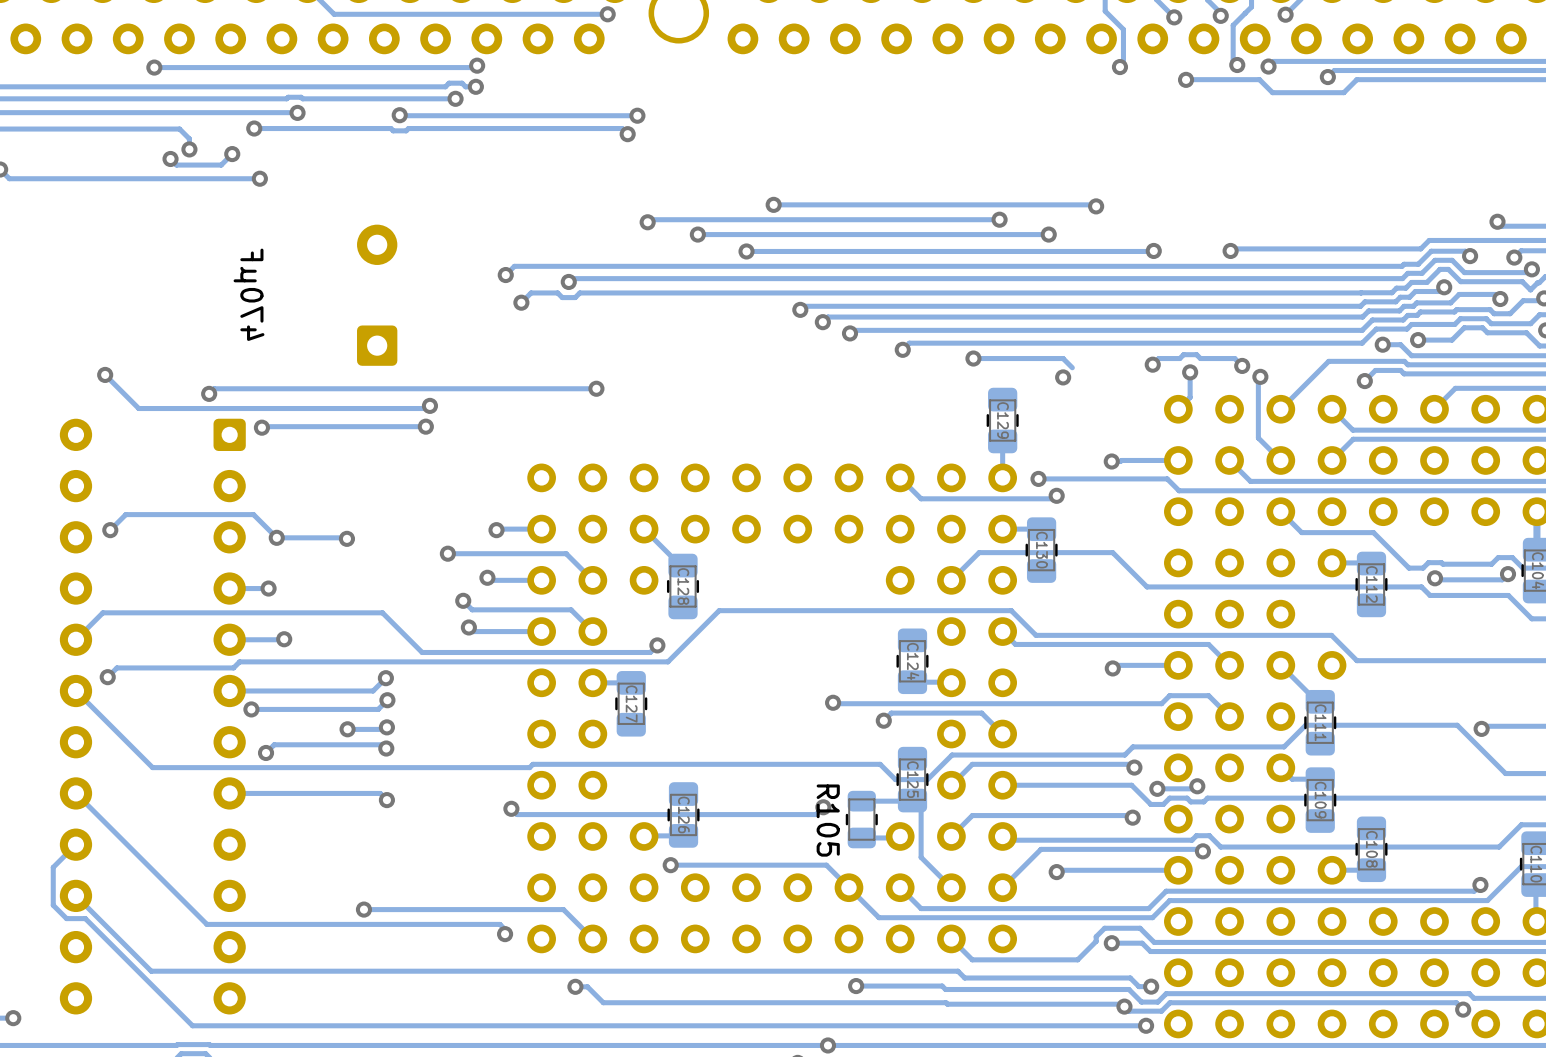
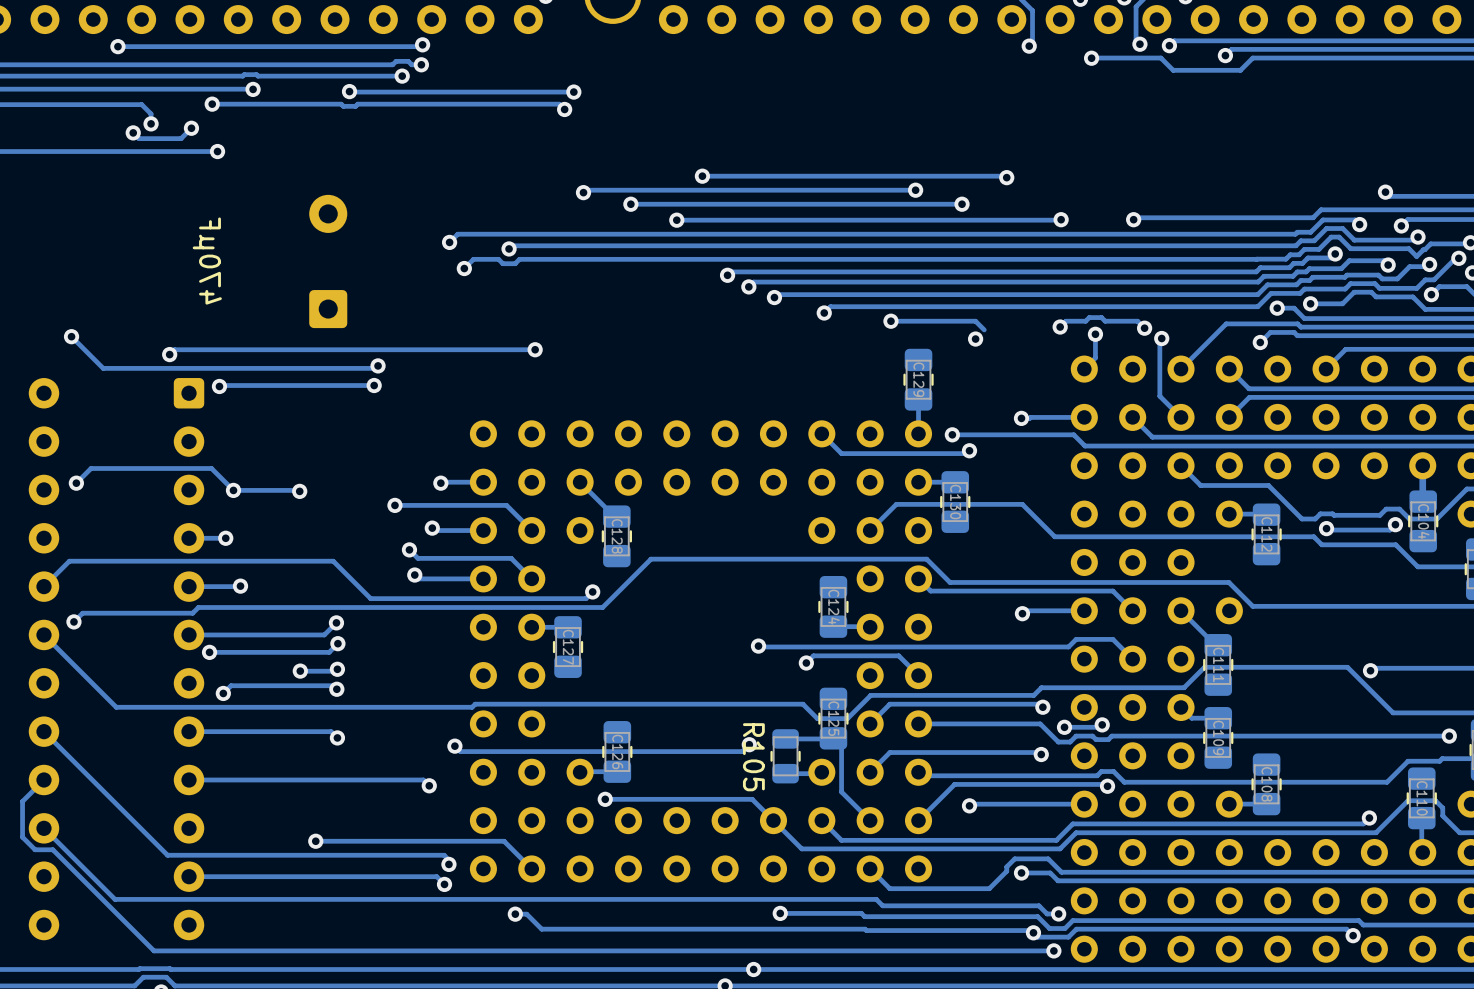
track: none -> (189, 780) (423, 780) (429, 785)
via: none -> (429, 785)
track: none -> (189, 876) (436, 876) (444, 884)
via: none -> (444, 884)

